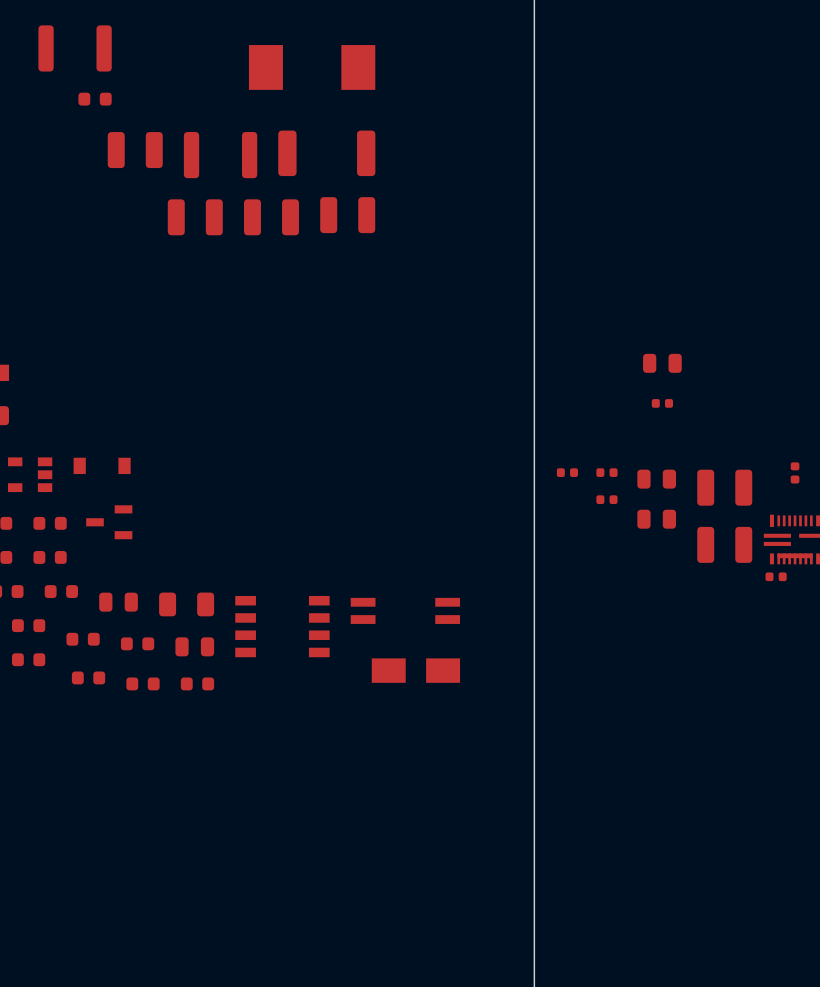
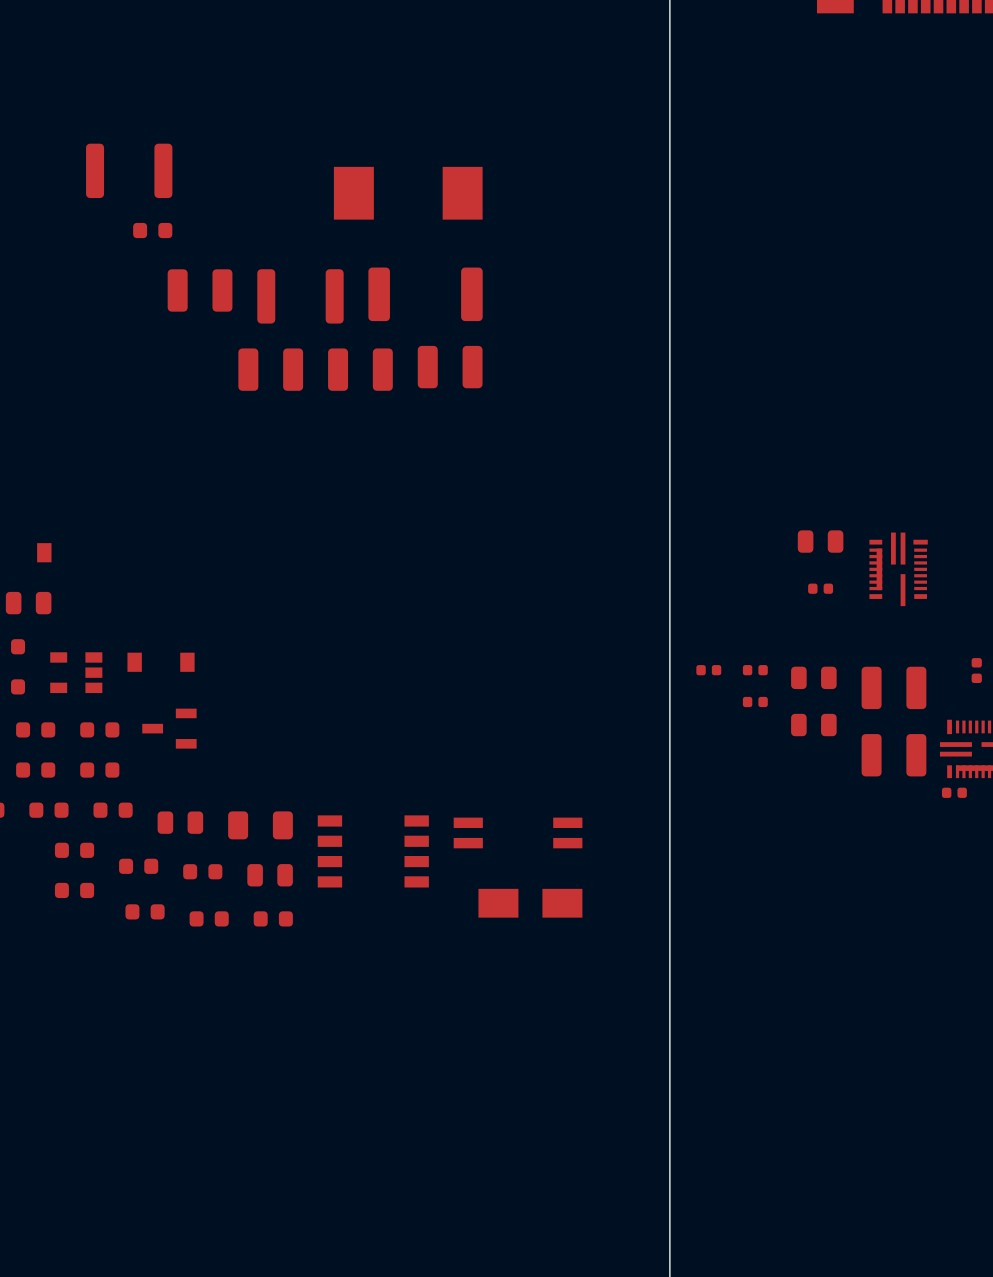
part: none -> (898, 569)

